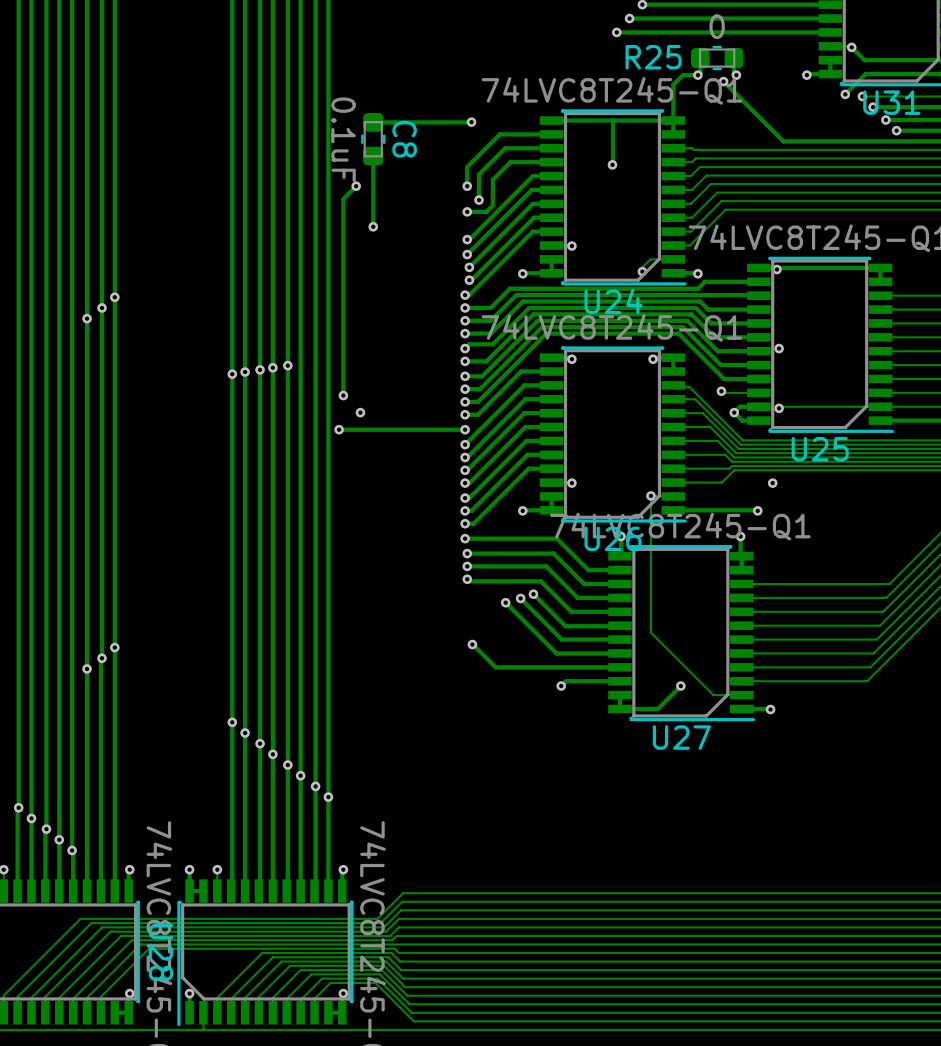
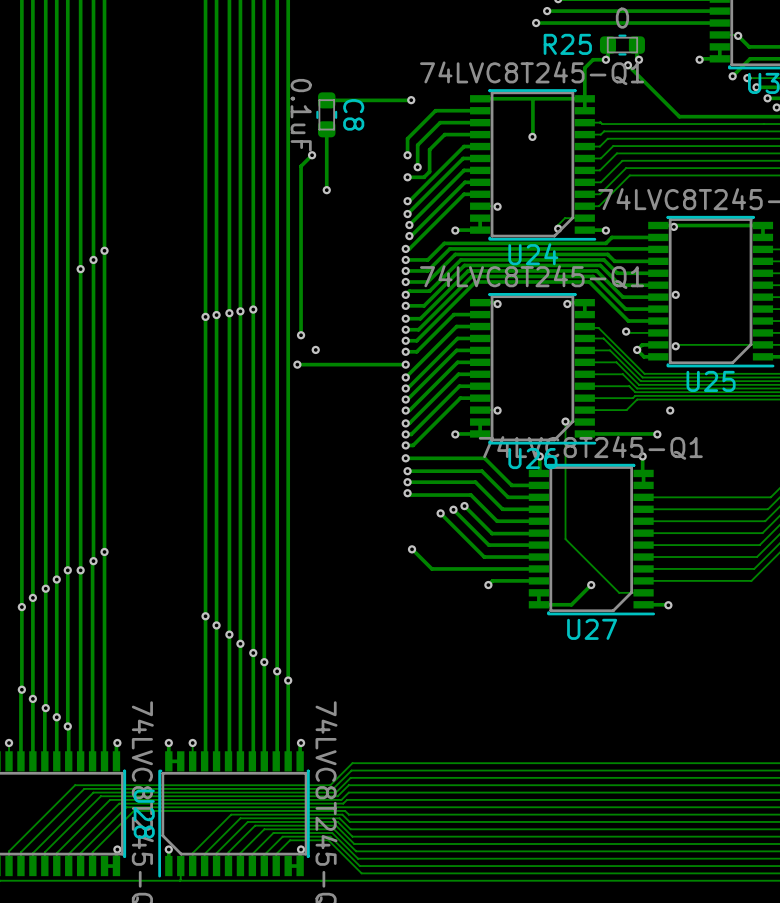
via: none -> (67, 570)
via: none -> (56, 579)
via: none -> (45, 588)
via: none -> (32, 597)
via: none -> (21, 607)

